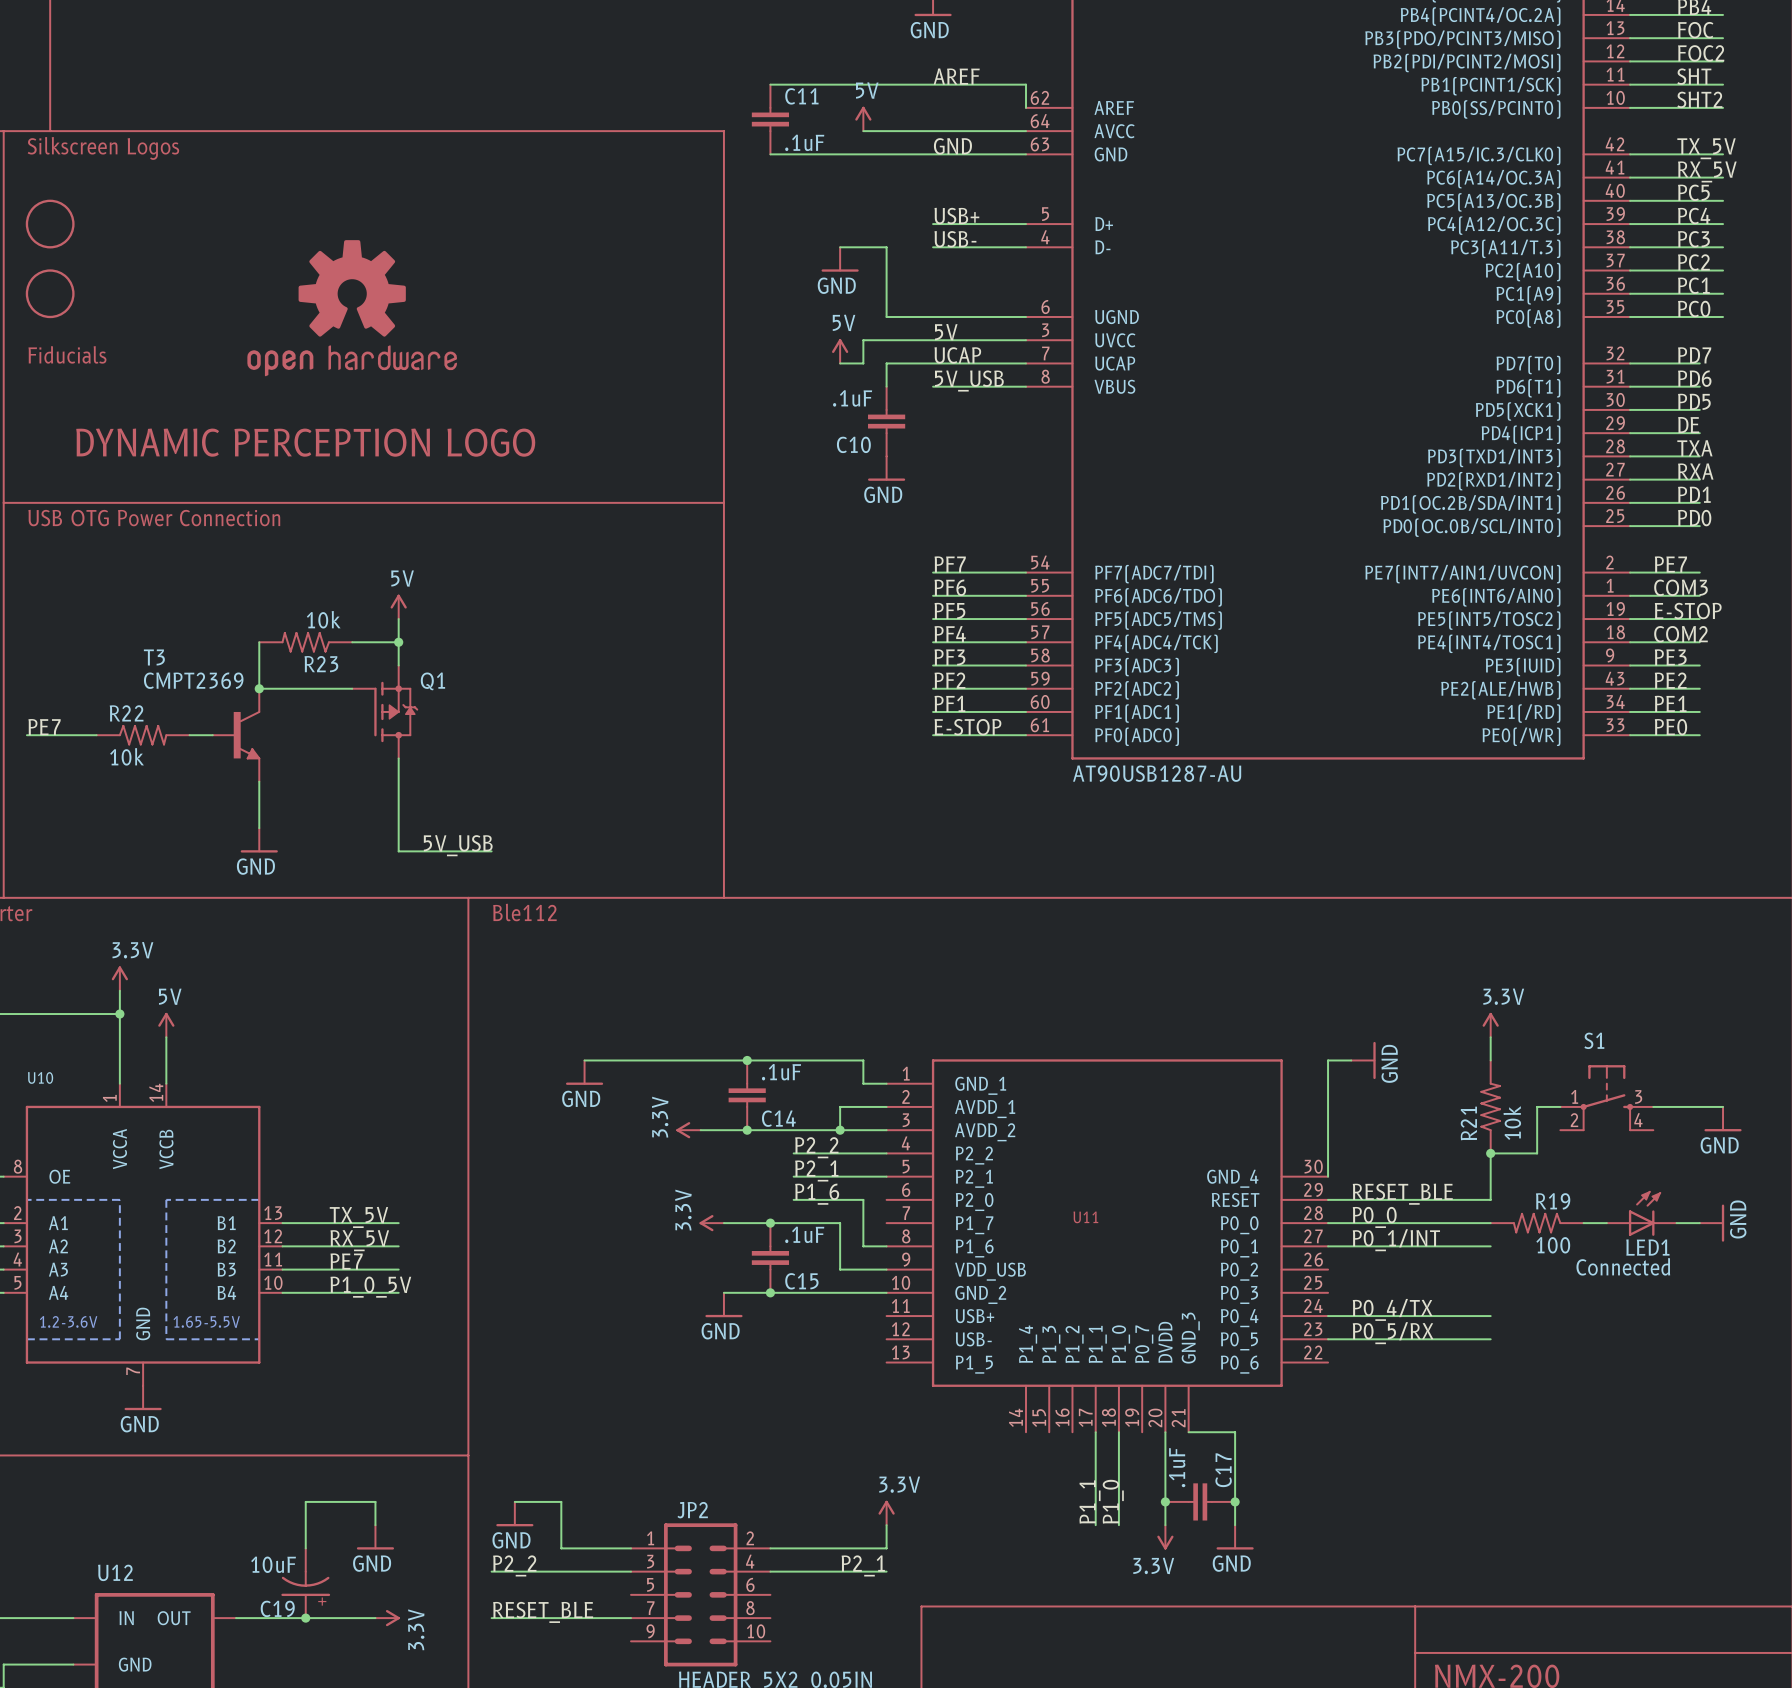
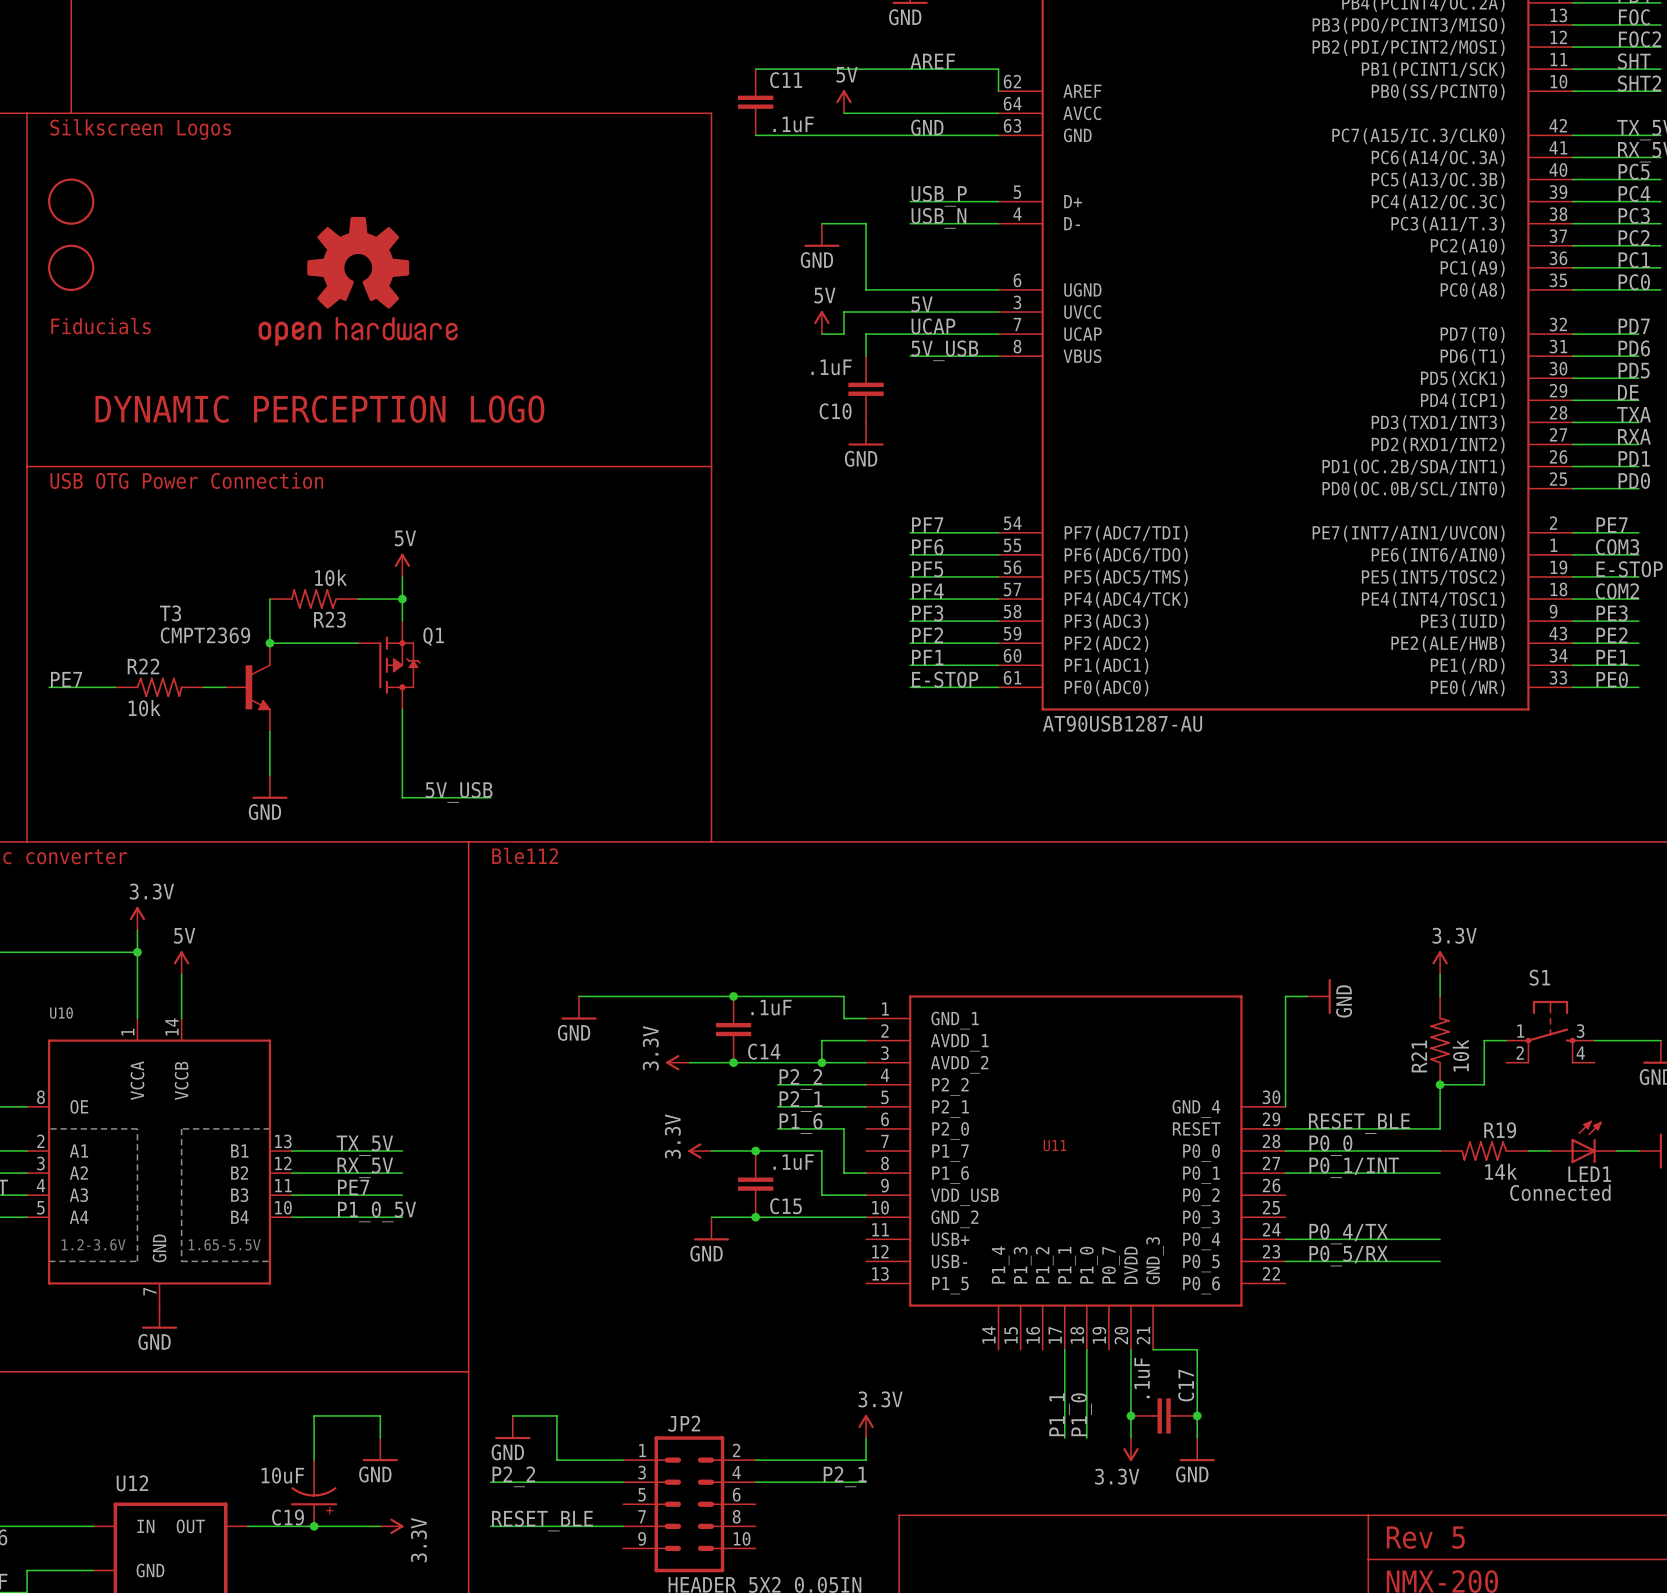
label: USB+ (956, 216) -> USB_P (939, 196)
label: USB- (955, 239) -> USB_N (938, 218)
R19 value: 100 (1553, 1245) -> 14k (1501, 1171)
text: none -> Rev 5 (1425, 1537)

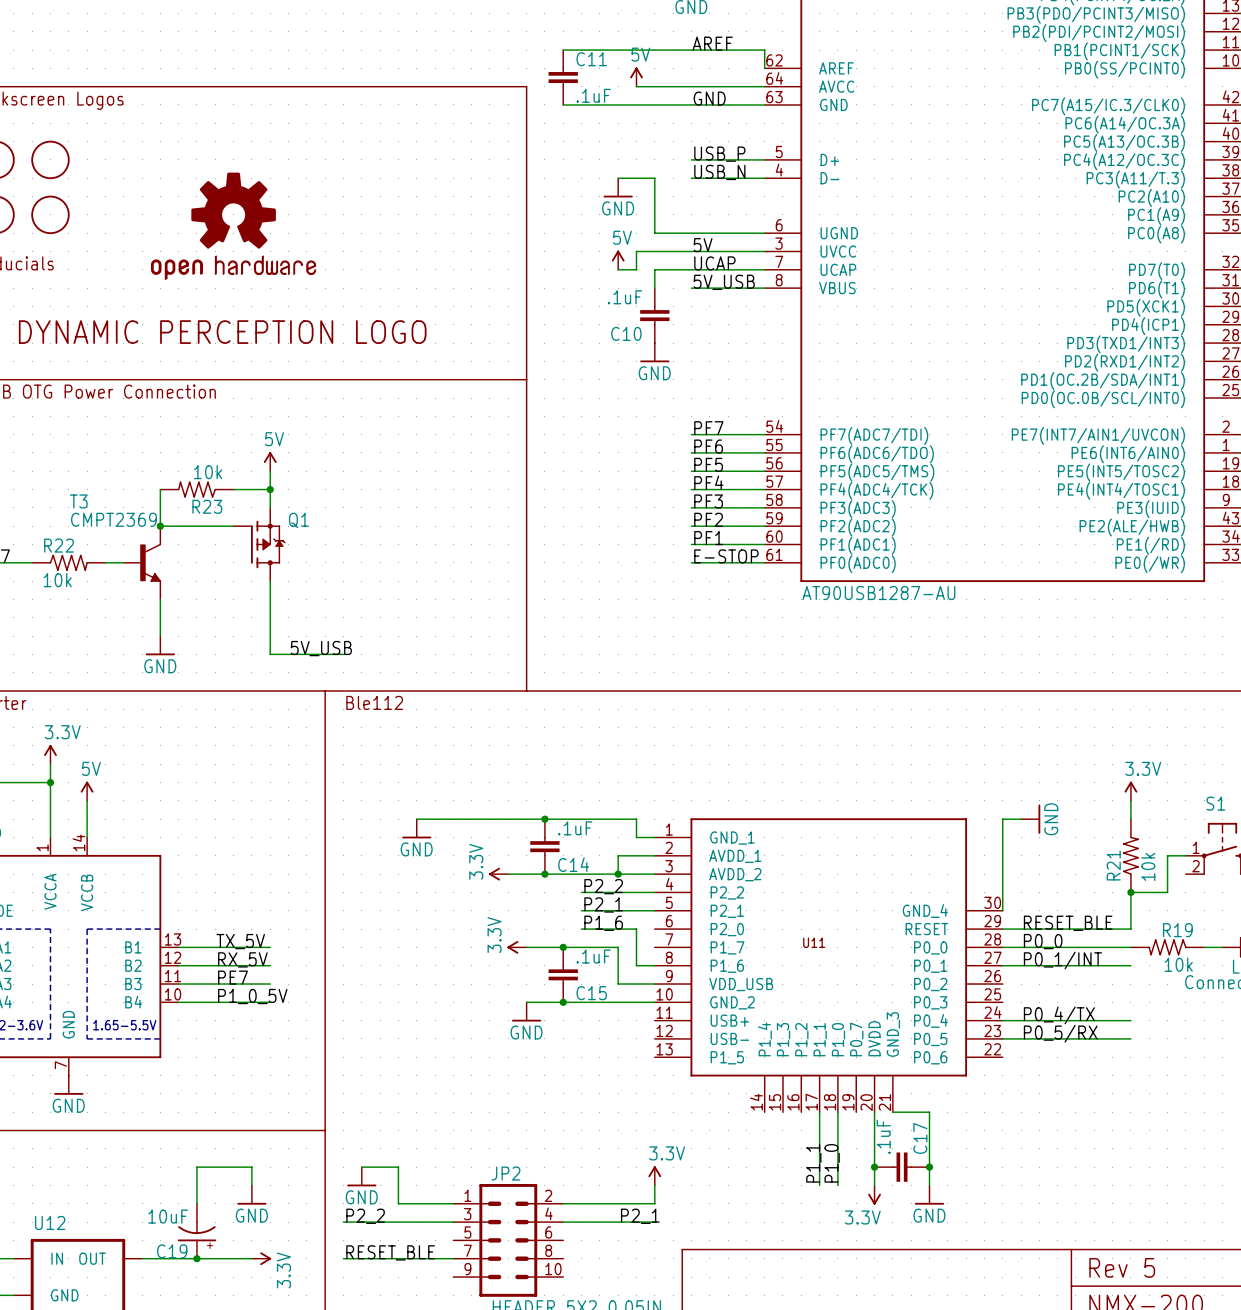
part: none -> (50, 159)
part: none -> (50, 214)
R19 value: 14k (1501, 1171) -> 10k (1178, 964)

